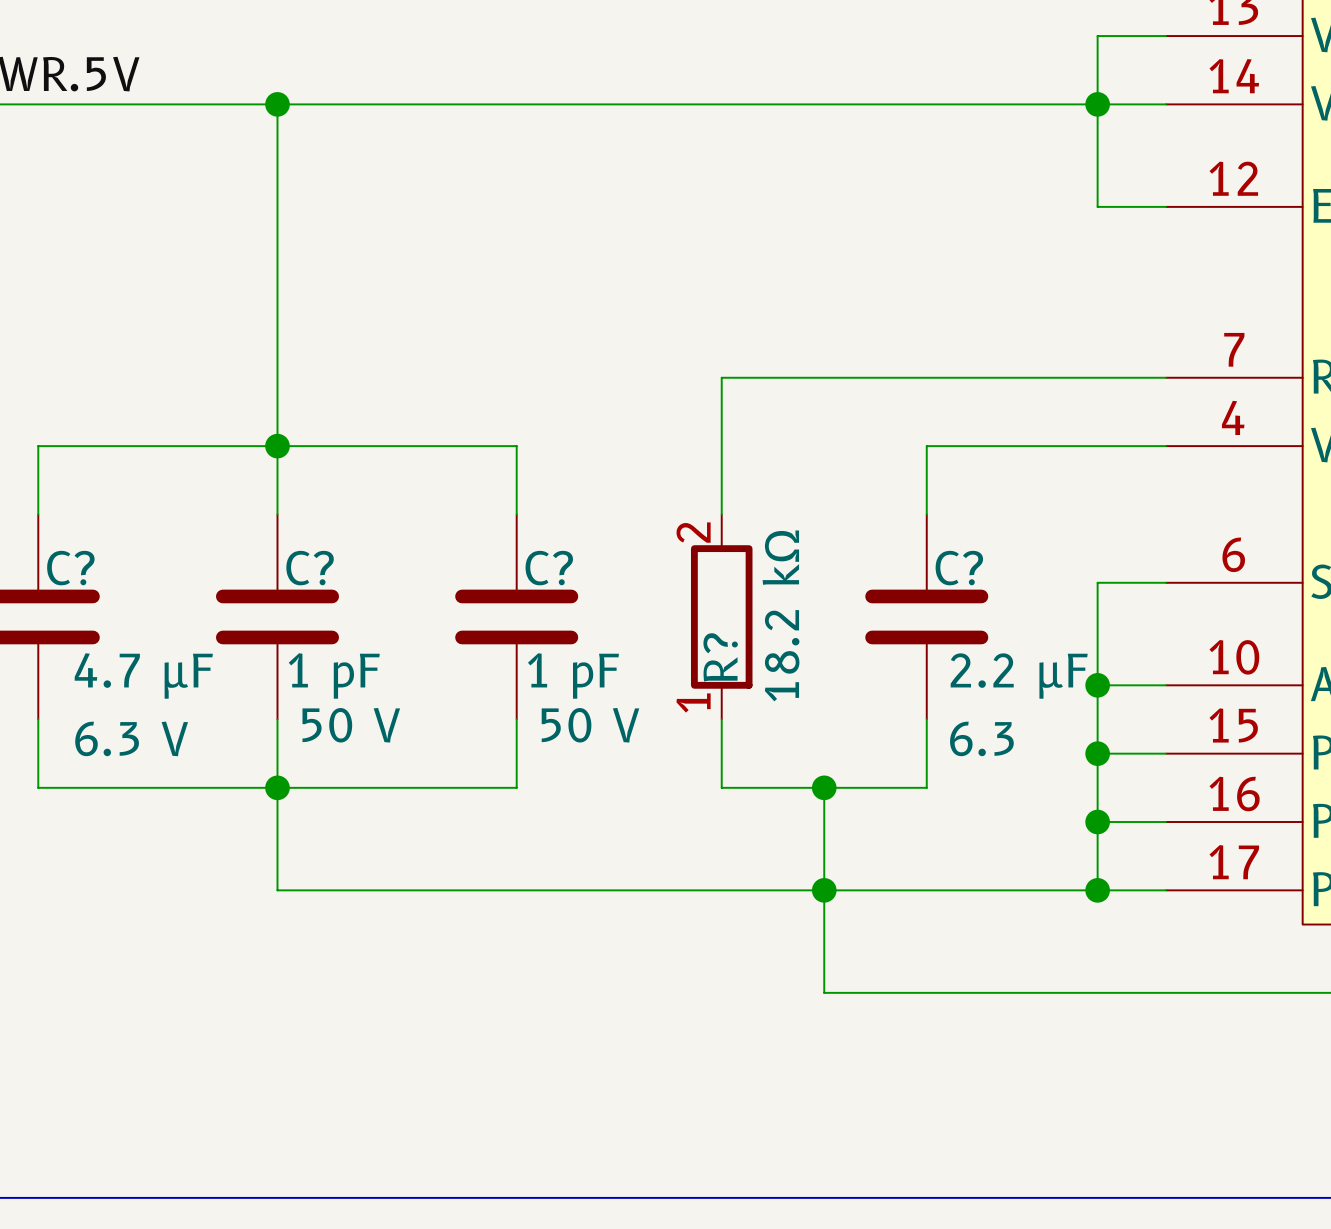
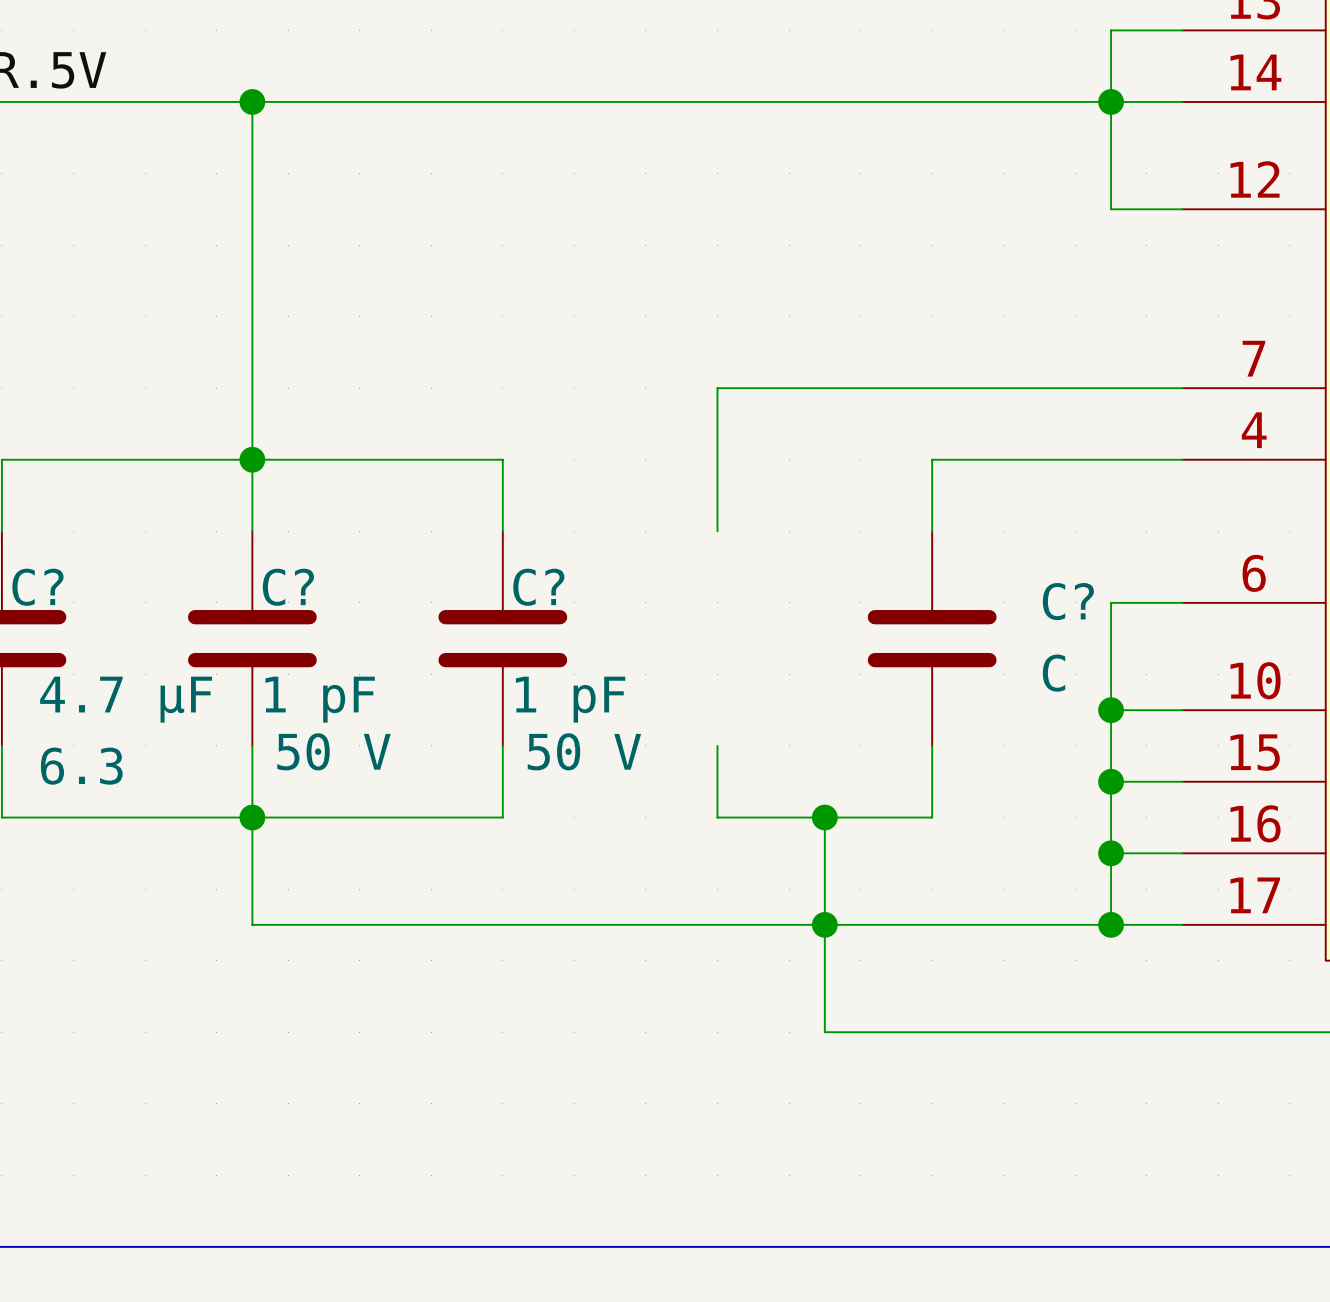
C? name position: C? (959, 568) -> C? (1068, 601)
R?: (721, 616) -> none
C? value: none -> C (1054, 673)
C? text: 2.2 µF (1019, 676) -> none
C? text: 6.3 V (131, 738) -> 6.3 (81, 766)
C? text: 6.3 (981, 738) -> none

